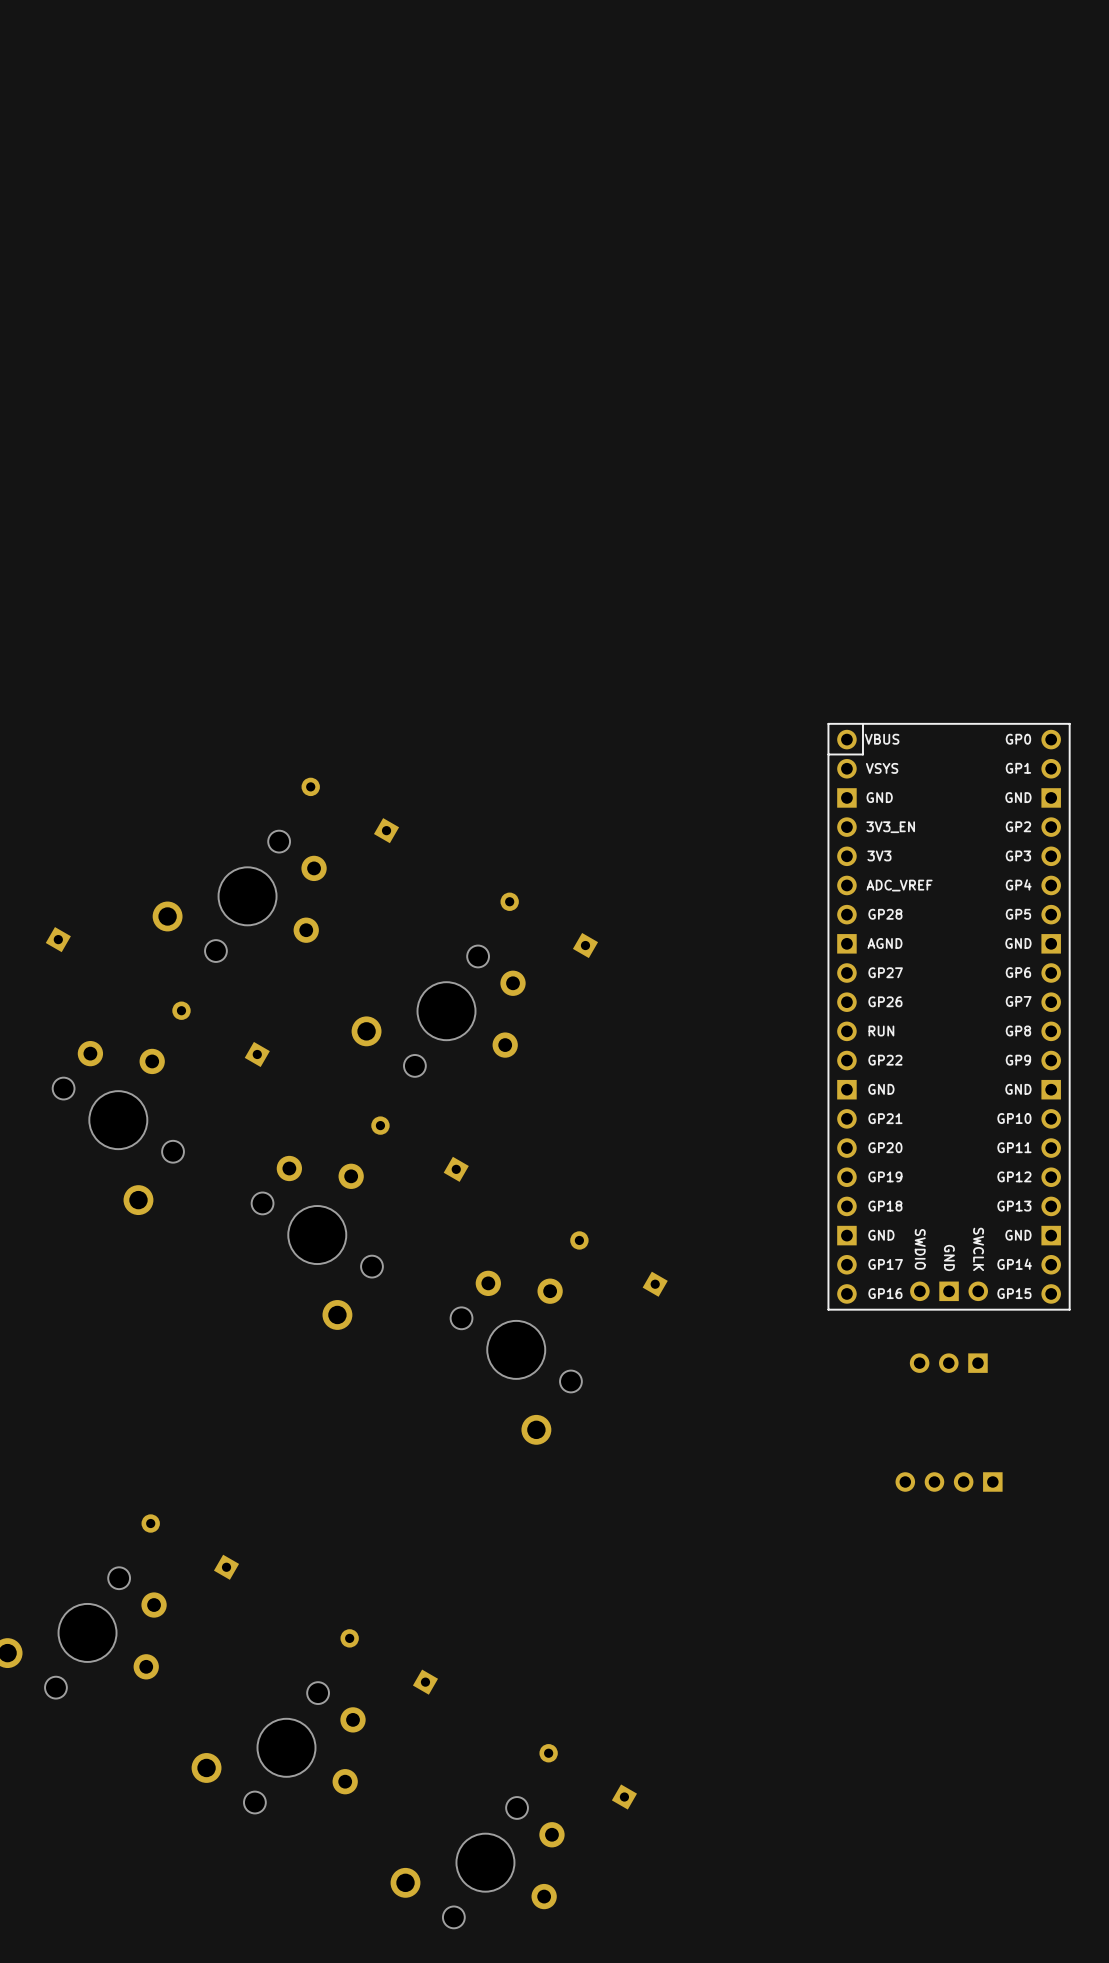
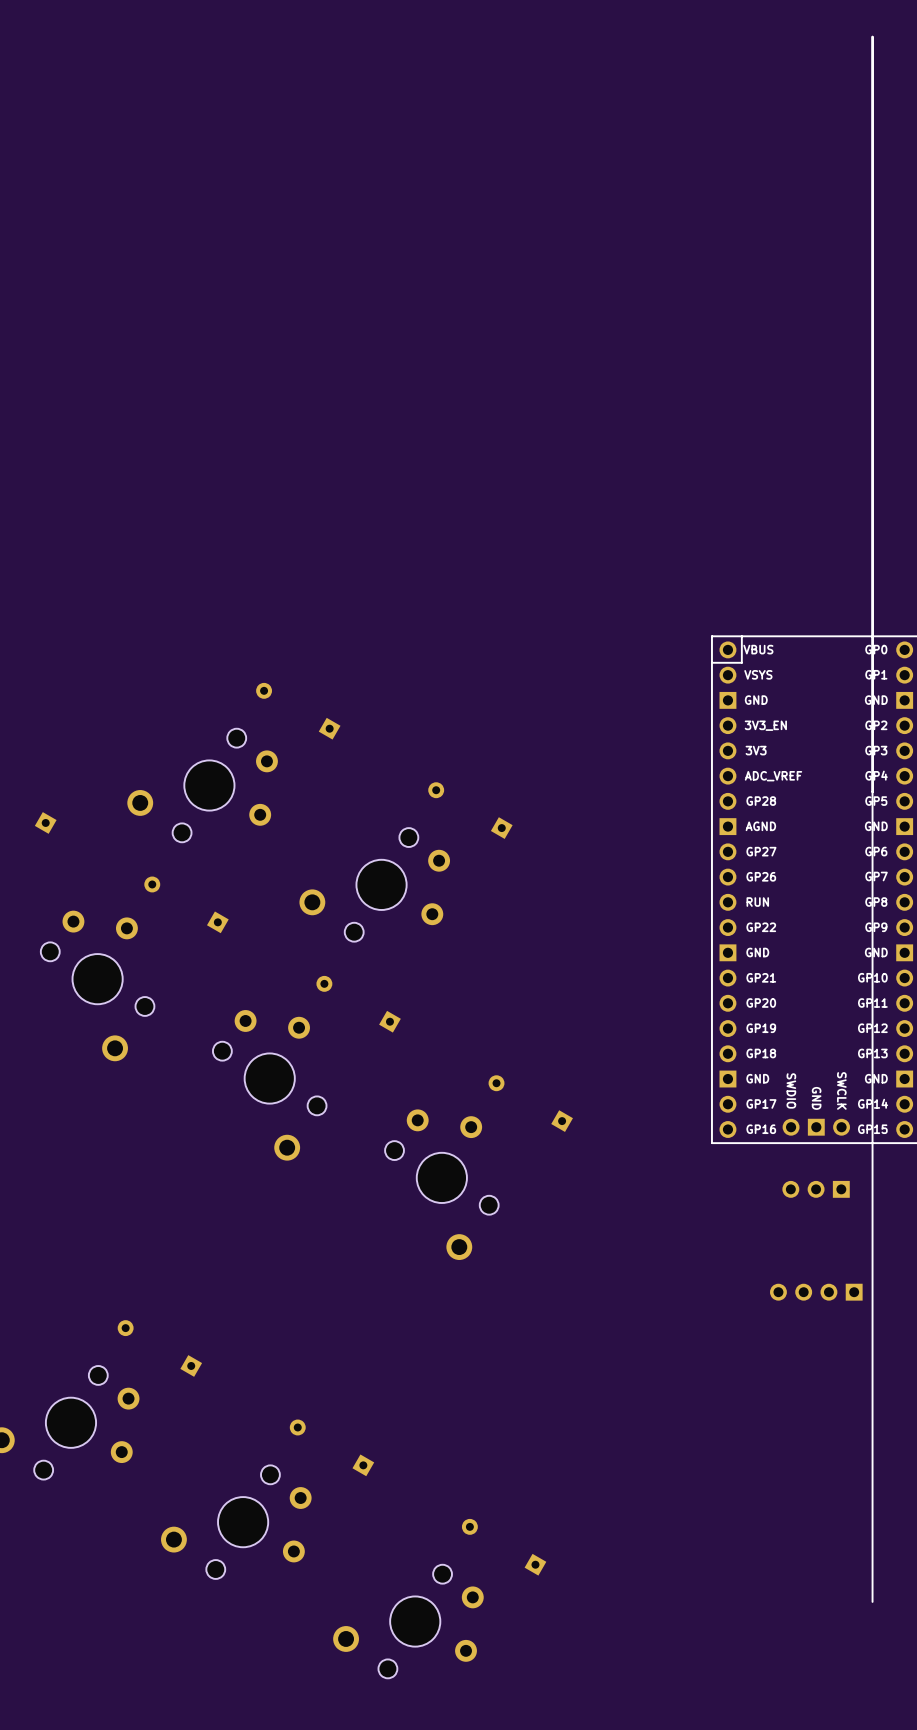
line: none -> (872, 36) (872, 1601)

